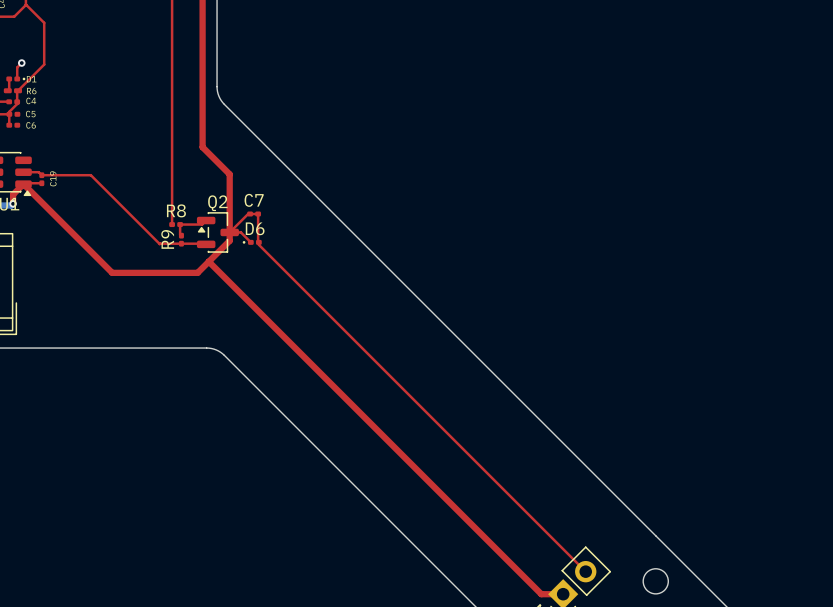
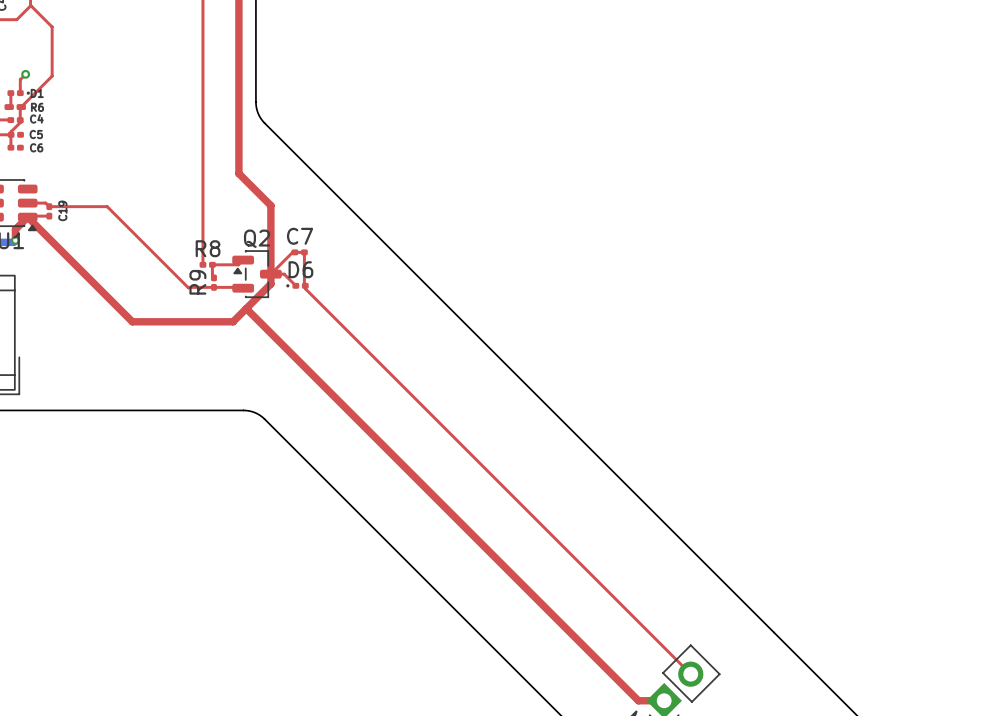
round board edge: [642, 568, 669, 595] -> none

